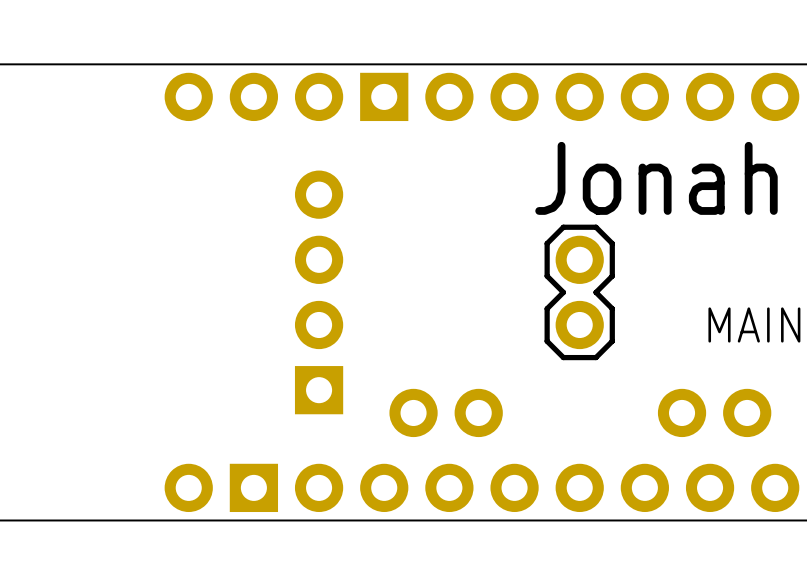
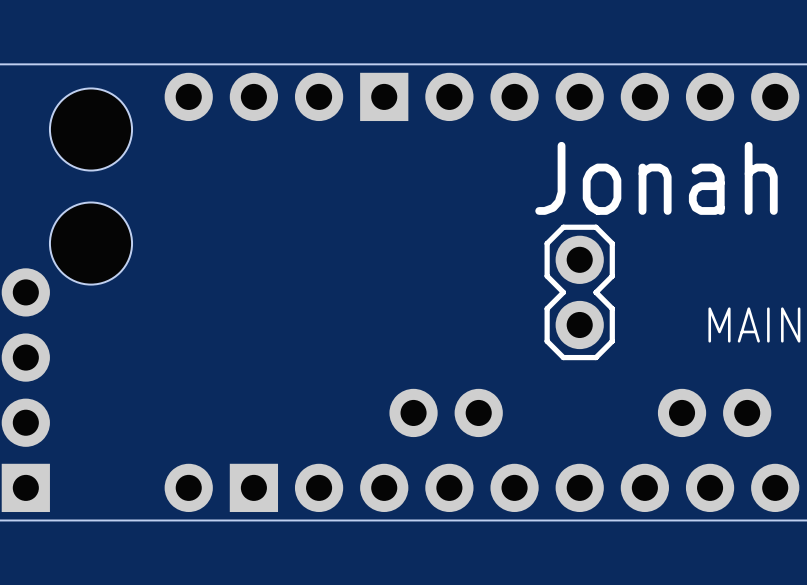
hole: none -> (91, 129)
hole: none -> (91, 243)
part position: (319, 292) -> (25, 390)

